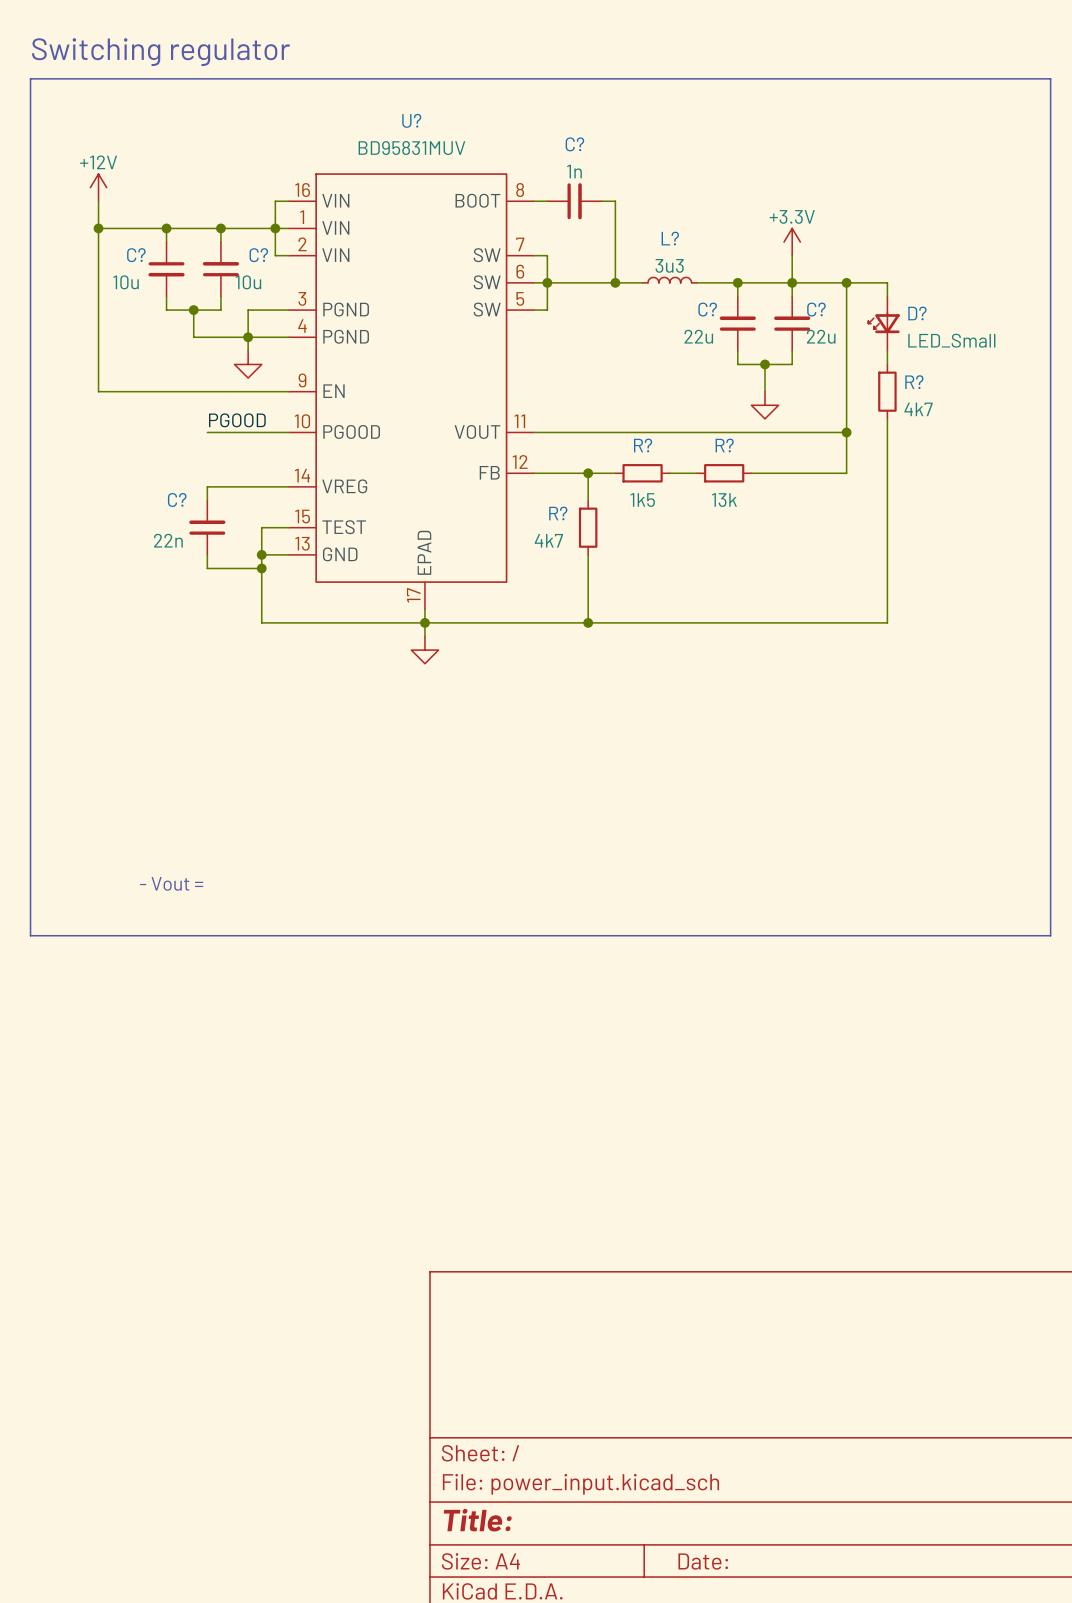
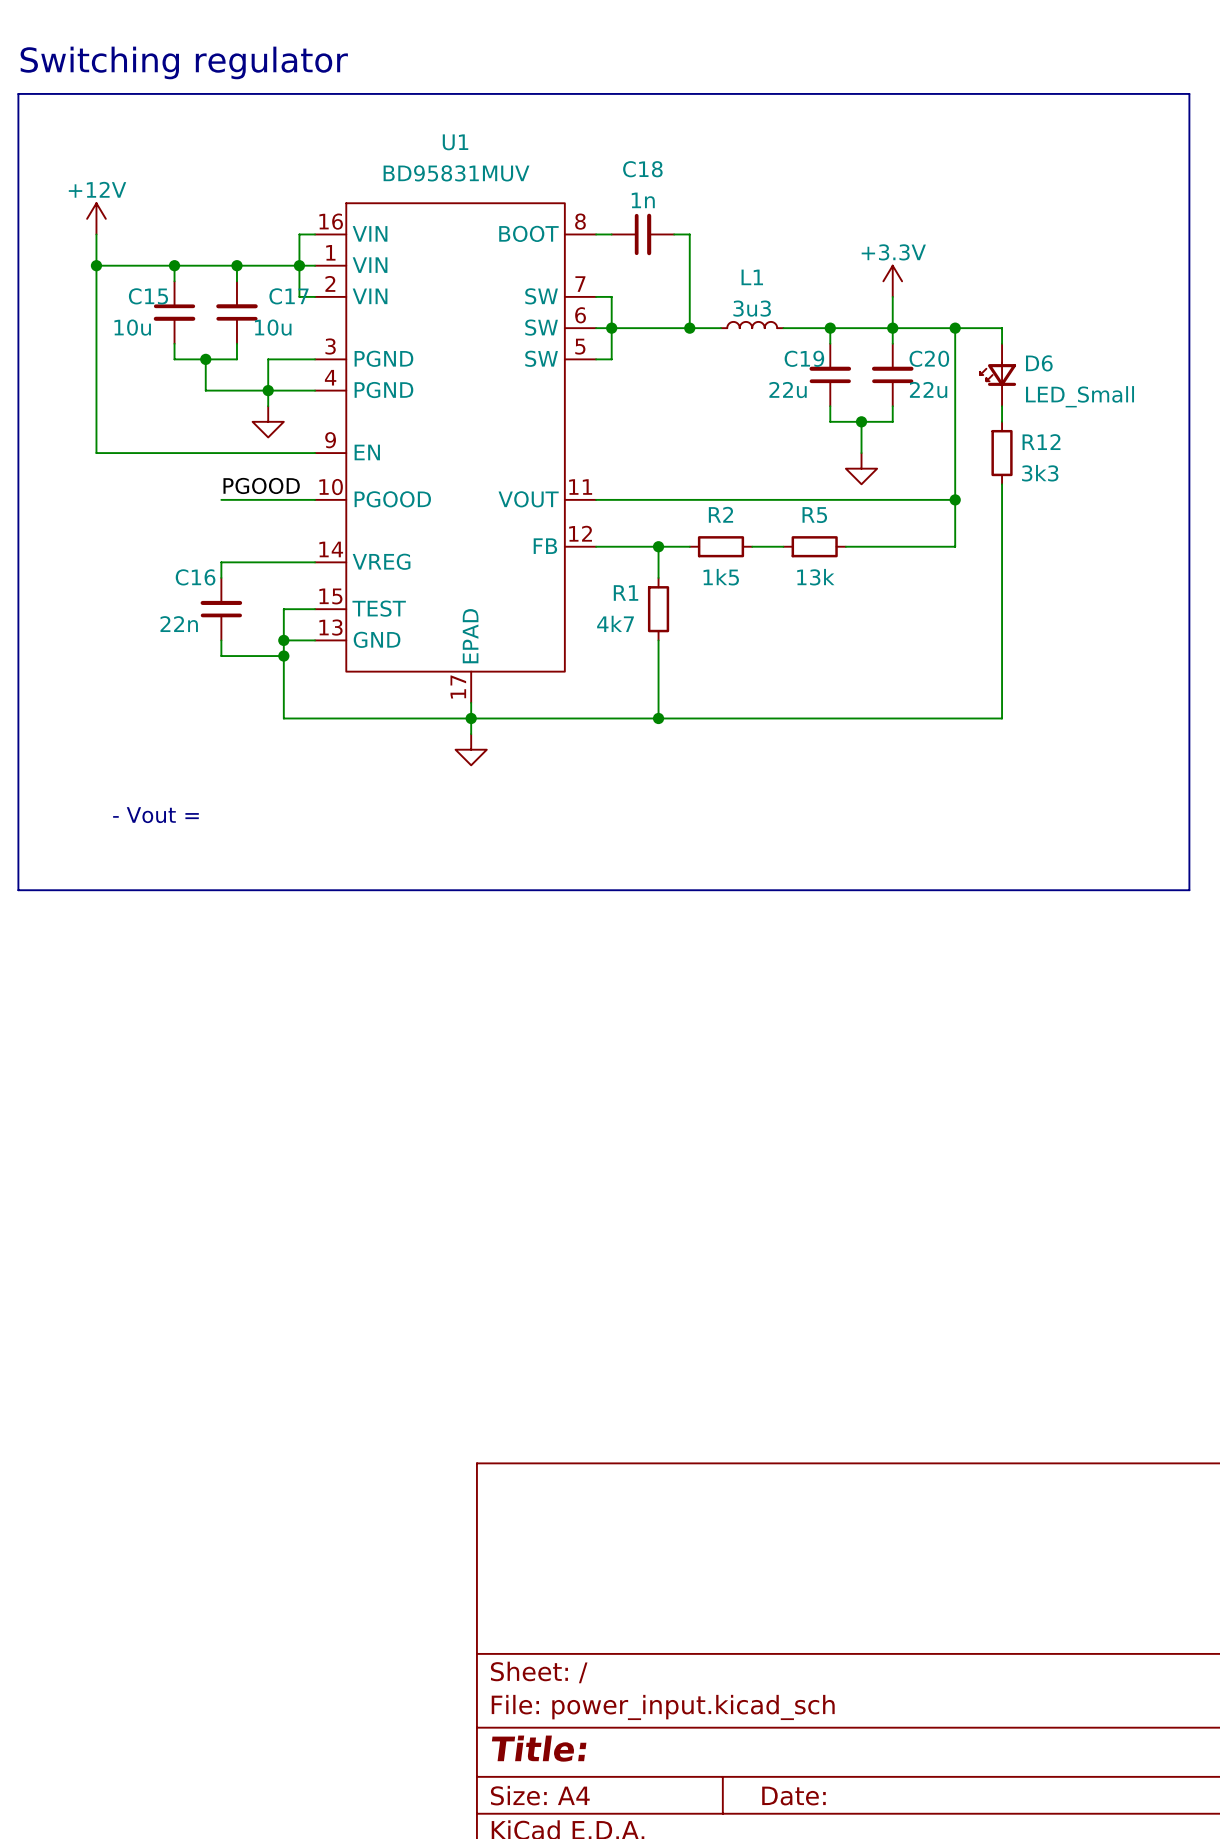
U? name: U? (411, 120) -> U1 (455, 142)
C? name: C? (574, 144) -> C18 (642, 169)
L? name: L? (670, 238) -> L1 (752, 277)
C? name: C? (136, 255) -> C15 (148, 296)
C? name: C? (258, 255) -> C17 (288, 296)
C? name: C? (707, 309) -> C19 (804, 358)
C? name: C? (816, 309) -> C20 (929, 358)
D? name: D? (917, 313) -> D6 (1039, 363)
R? name: R? (914, 382) -> R12 (1041, 442)
R? value: 4k7 (918, 409) -> 3k3 (1040, 473)
R? name: R? (643, 445) -> R2 (720, 514)
R? name: R? (724, 445) -> R5 (814, 515)
C? name: C? (177, 499) -> C16 (195, 577)
R? name: R? (558, 513) -> R1 (626, 592)
line: (30, 772) (30, 935) (1050, 935) (1050, 772) -> (18, 890) (1189, 890)
text position: - Vout = (171, 883) -> - Vout = (155, 815)

